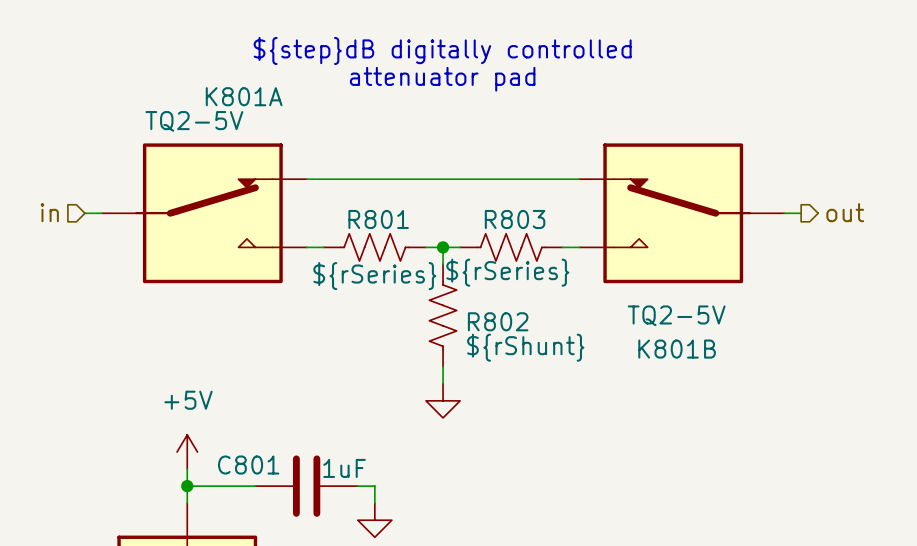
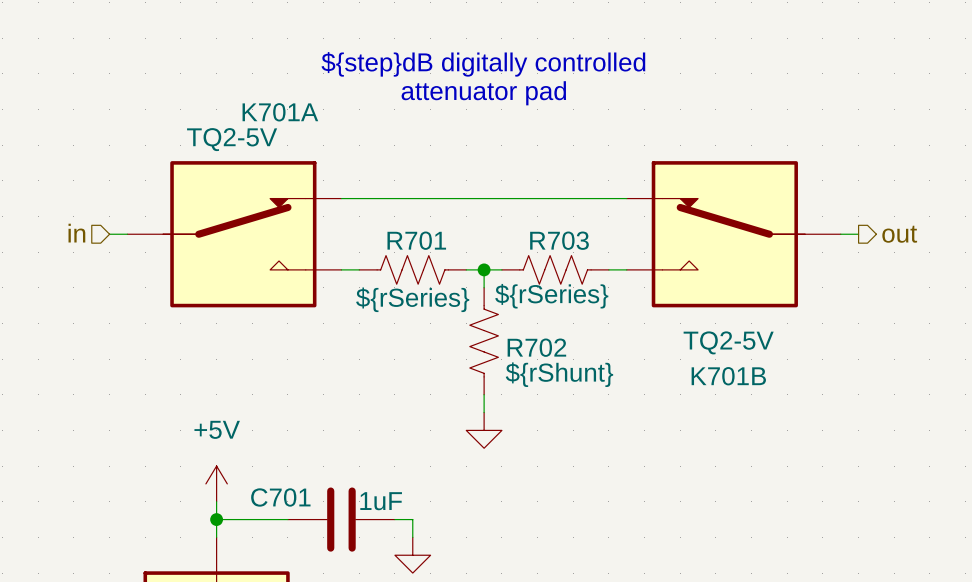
K801A name: K801A (244, 96) -> K701A (280, 112)
R801 name: R801 (378, 219) -> R701 (416, 240)
R803 name: R803 (515, 219) -> R703 (559, 240)
R802 name: R802 (498, 321) -> R702 (536, 347)
K801B name: K801B (677, 349) -> K701B (728, 376)
C801 name: C801 (248, 465) -> C701 (280, 497)

